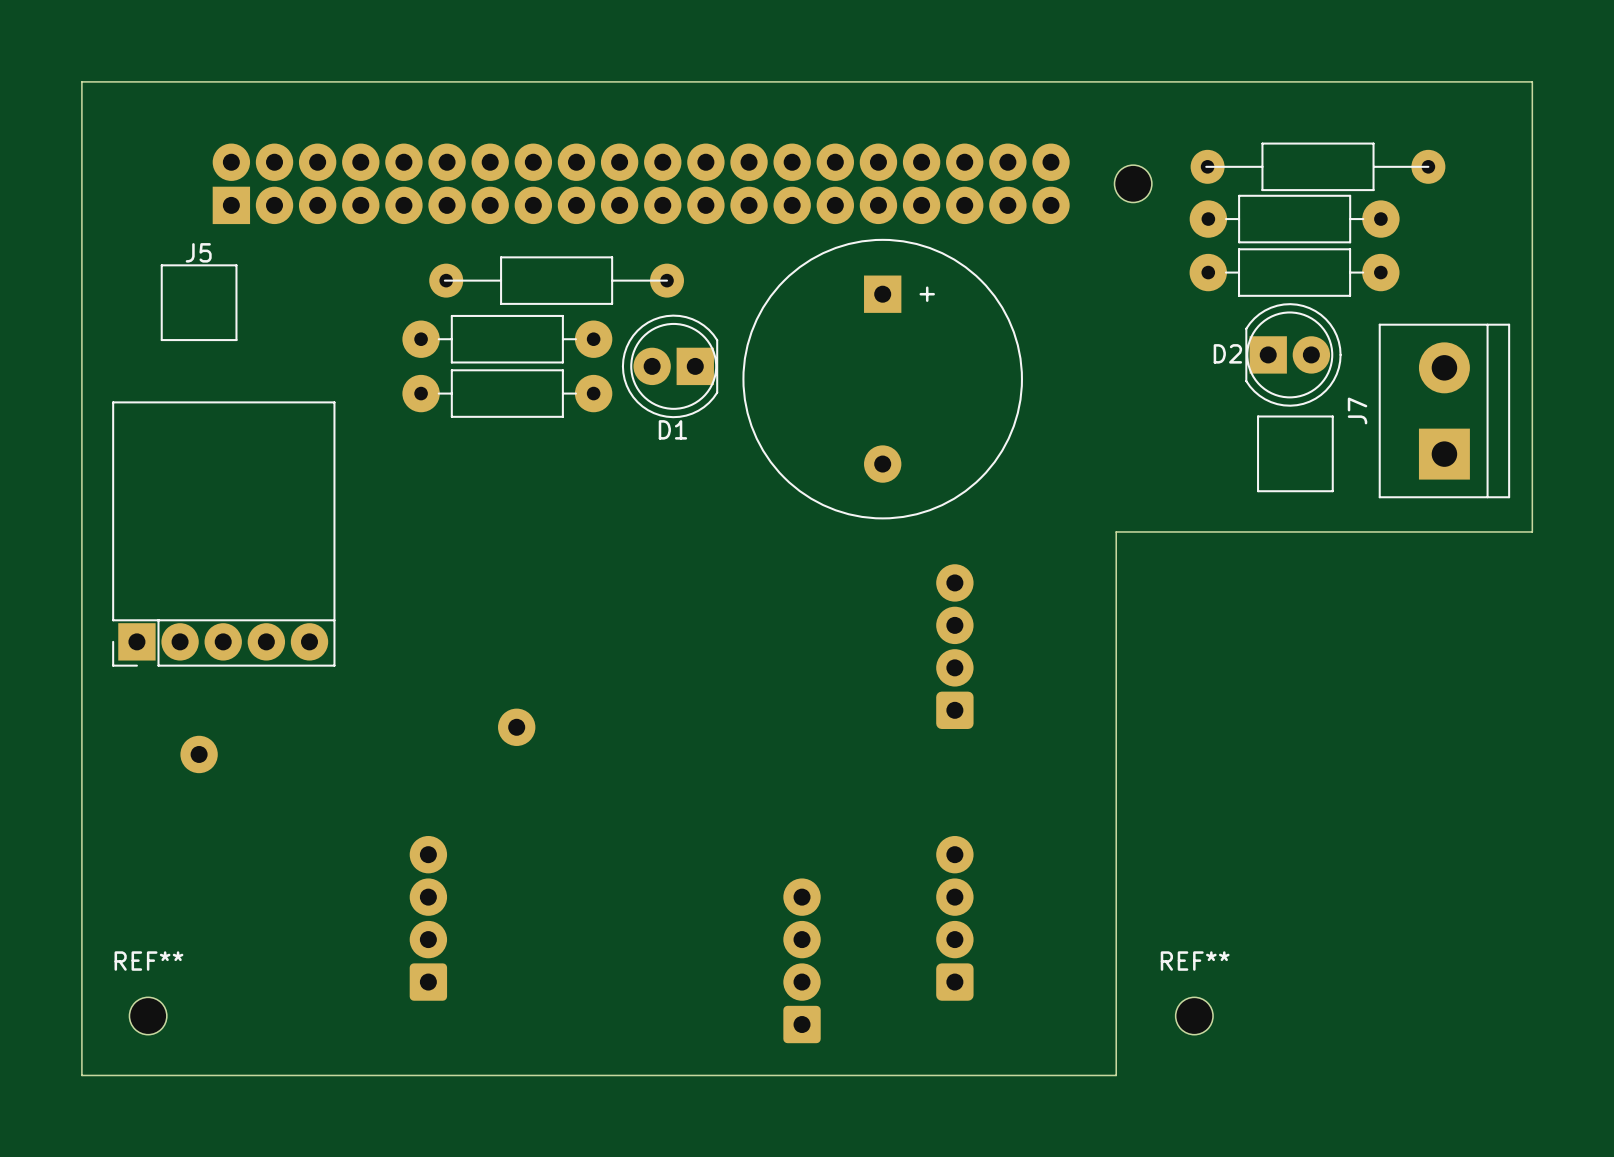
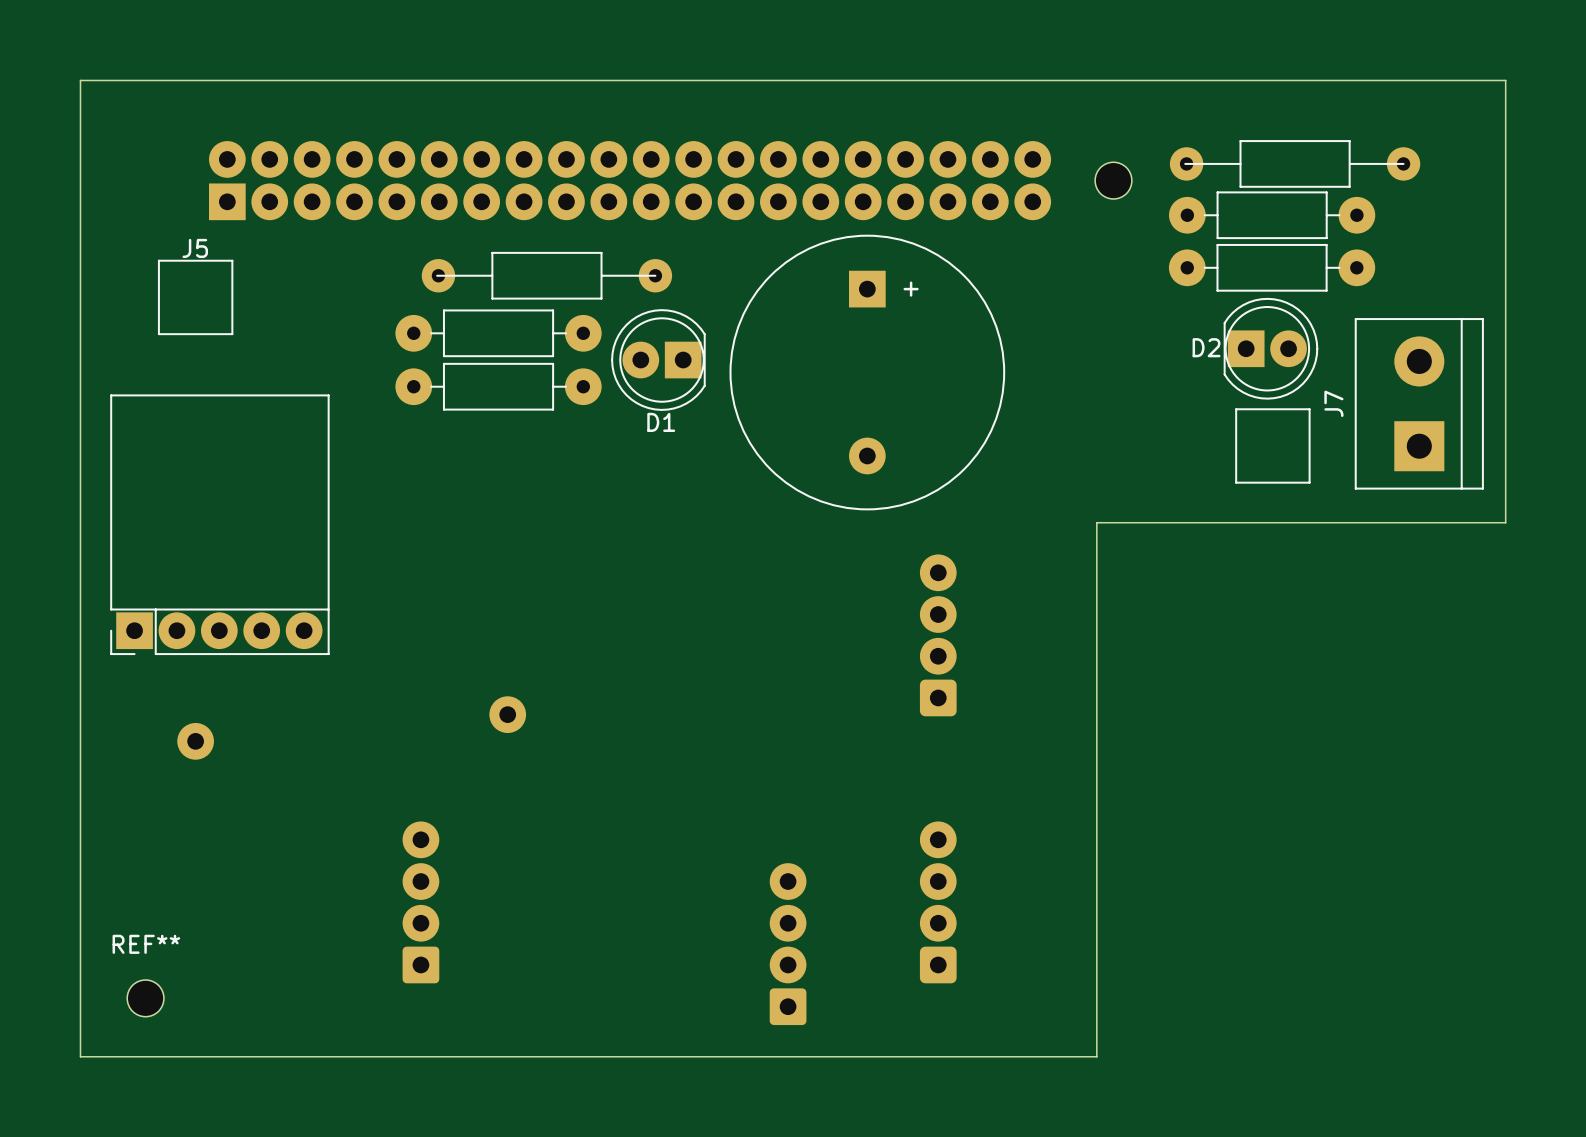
REF**: (1194, 1016) -> none

